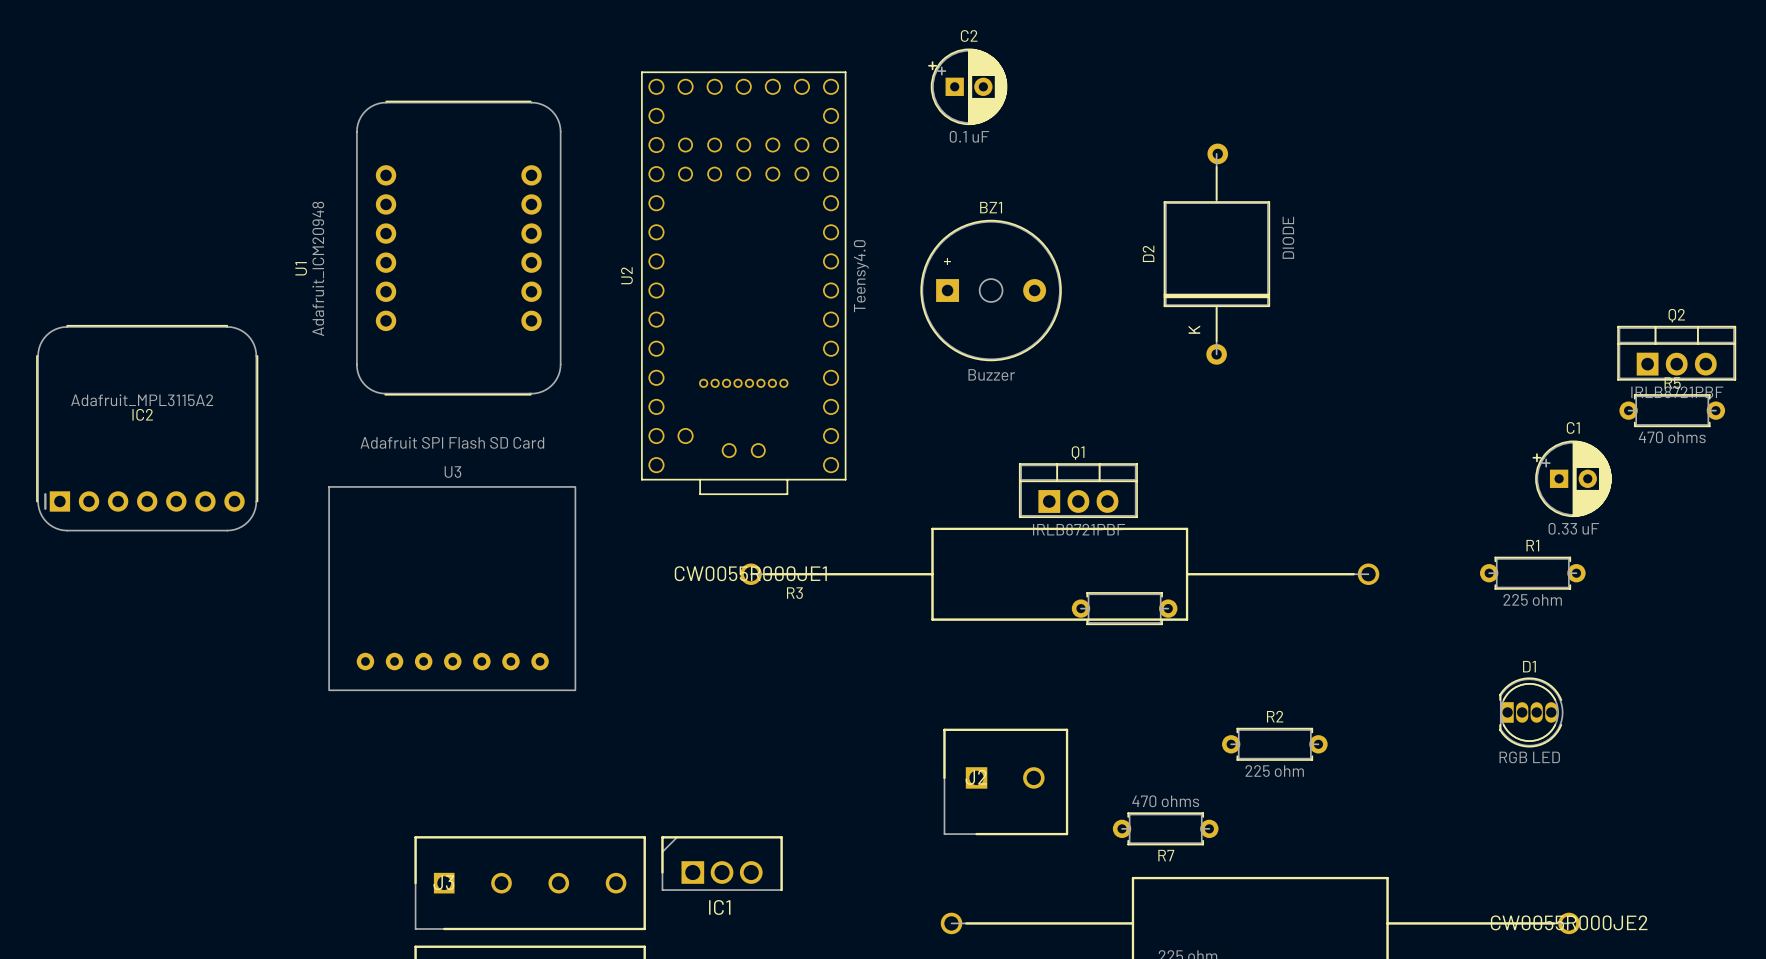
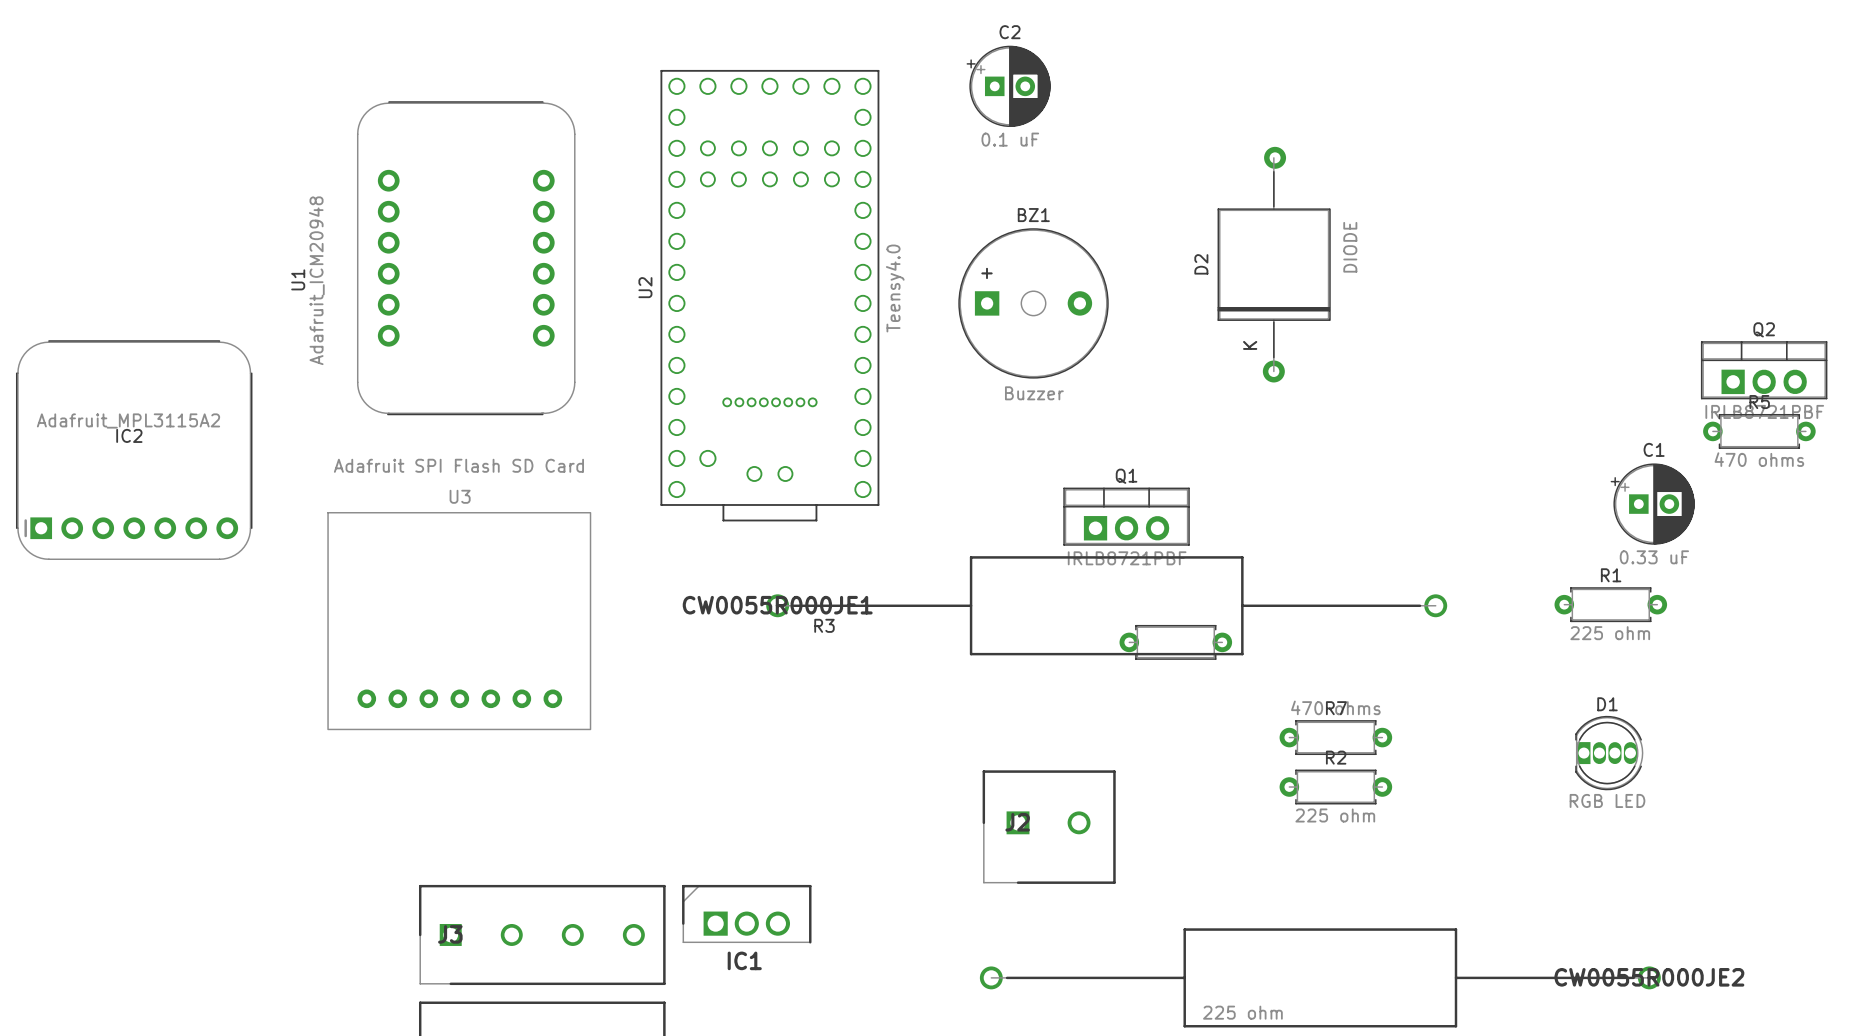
R7 position: (1165, 828) -> (1335, 737)
R7 name position: R7 (1166, 855) -> R7 (1336, 708)

